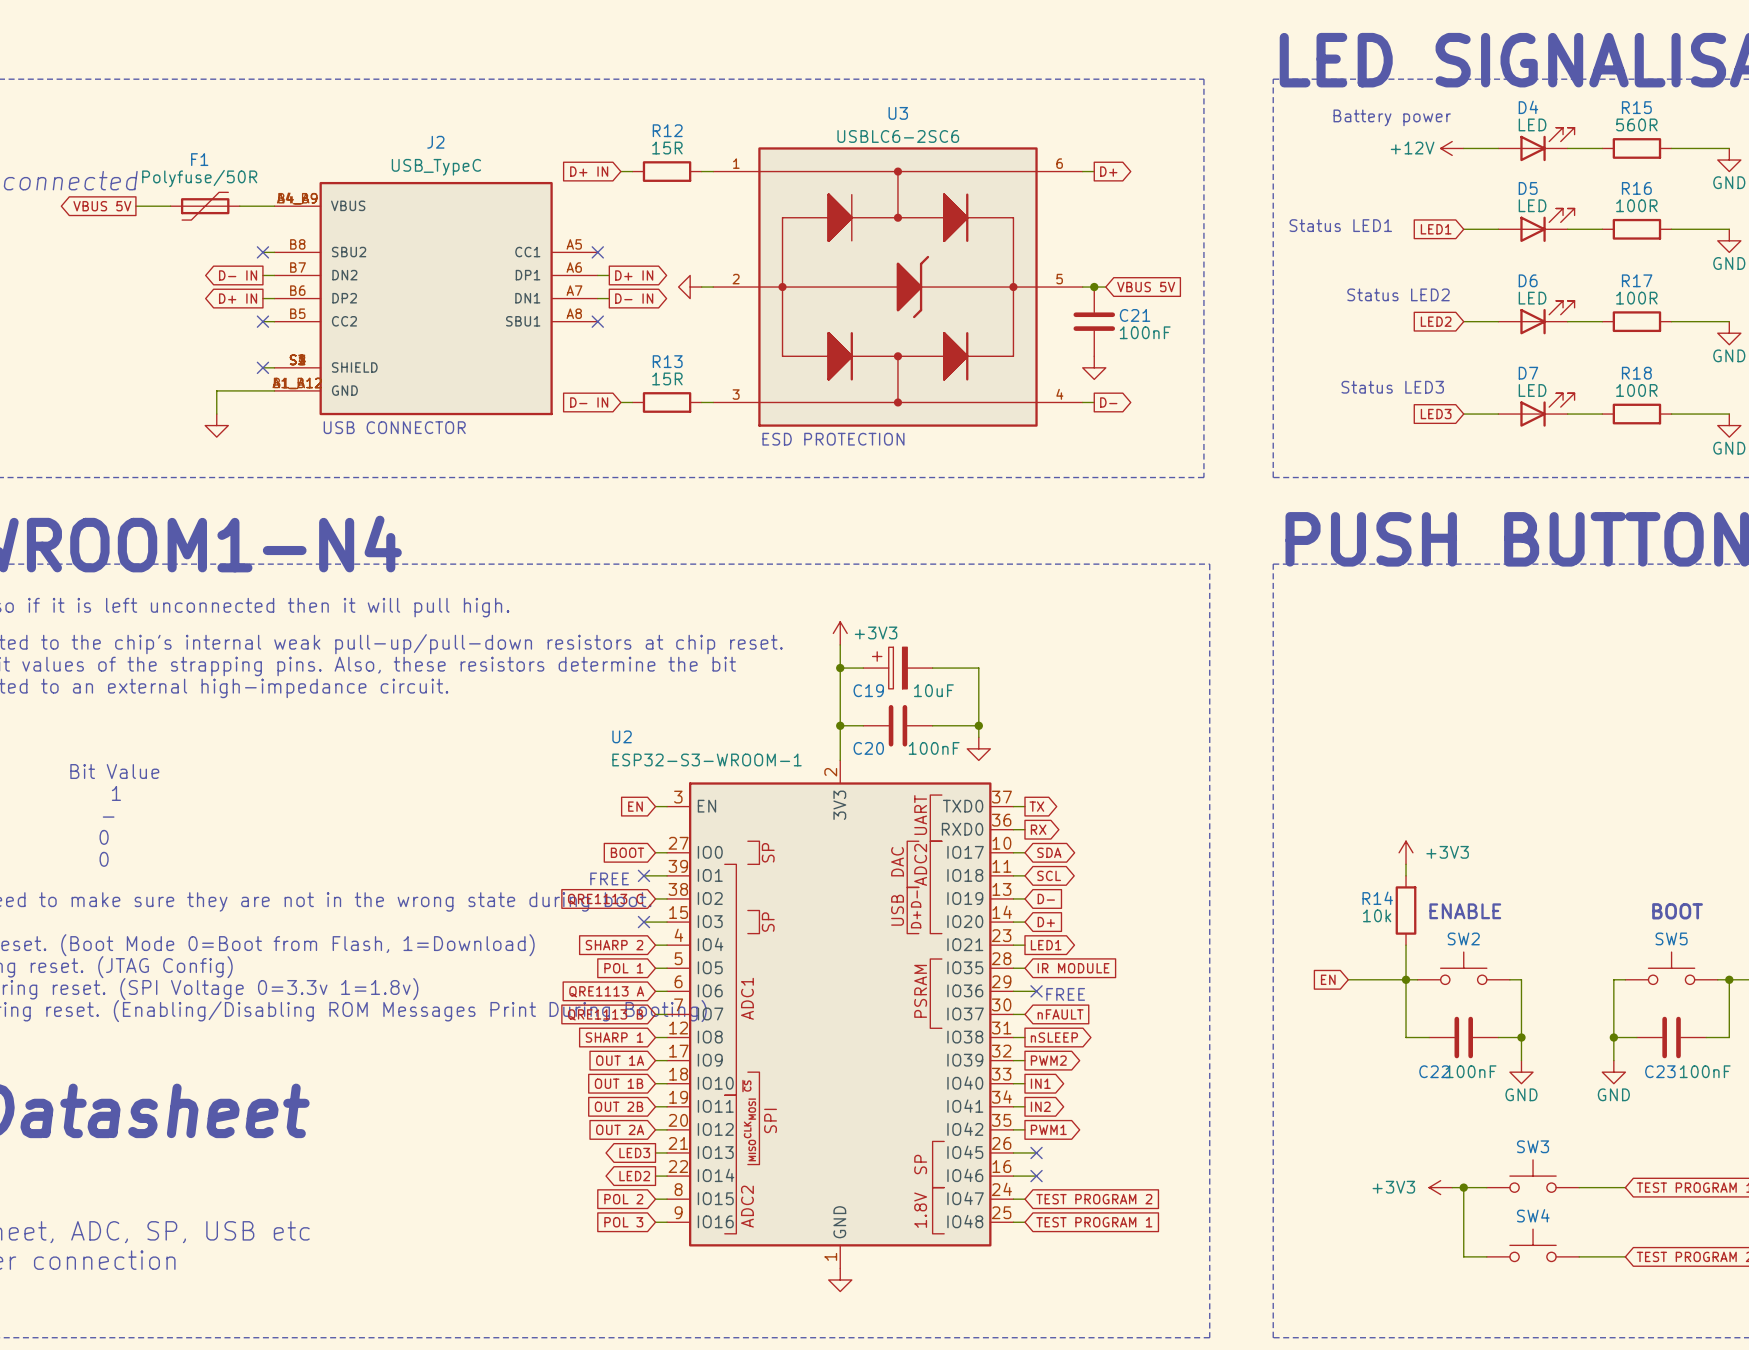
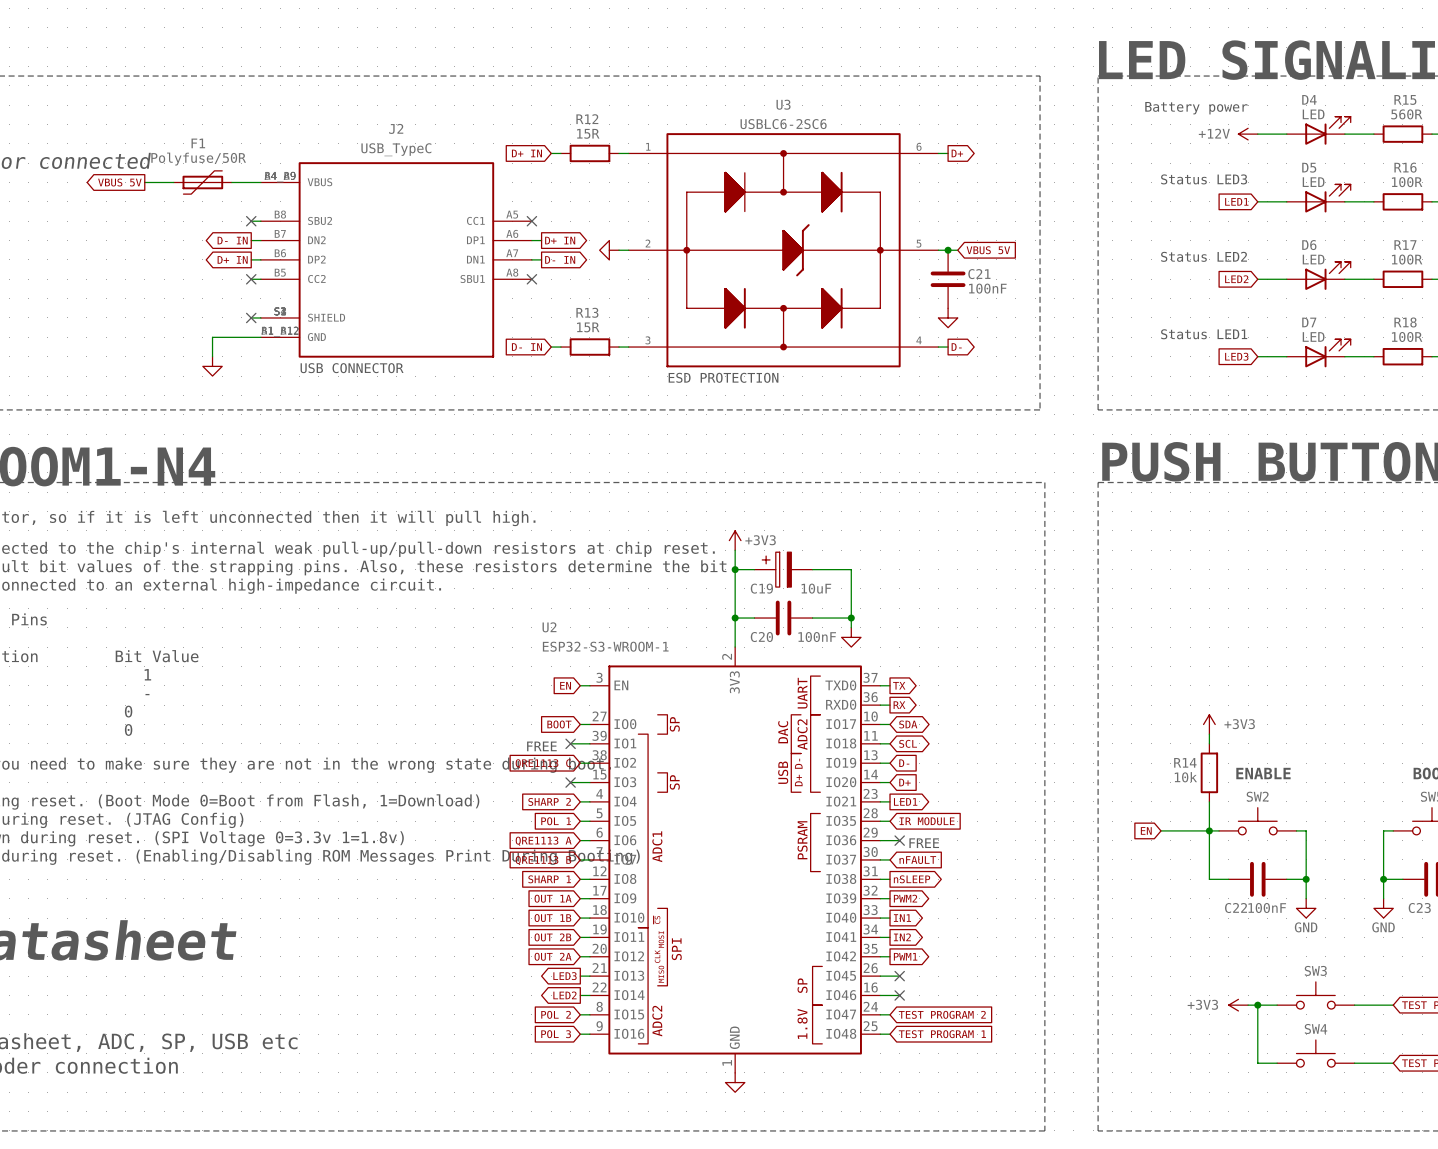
text position: Status LED1 (1340, 225) -> Status LED1 (1204, 334)
text position: Status LED3 (1392, 387) -> Status LED3 (1204, 179)

